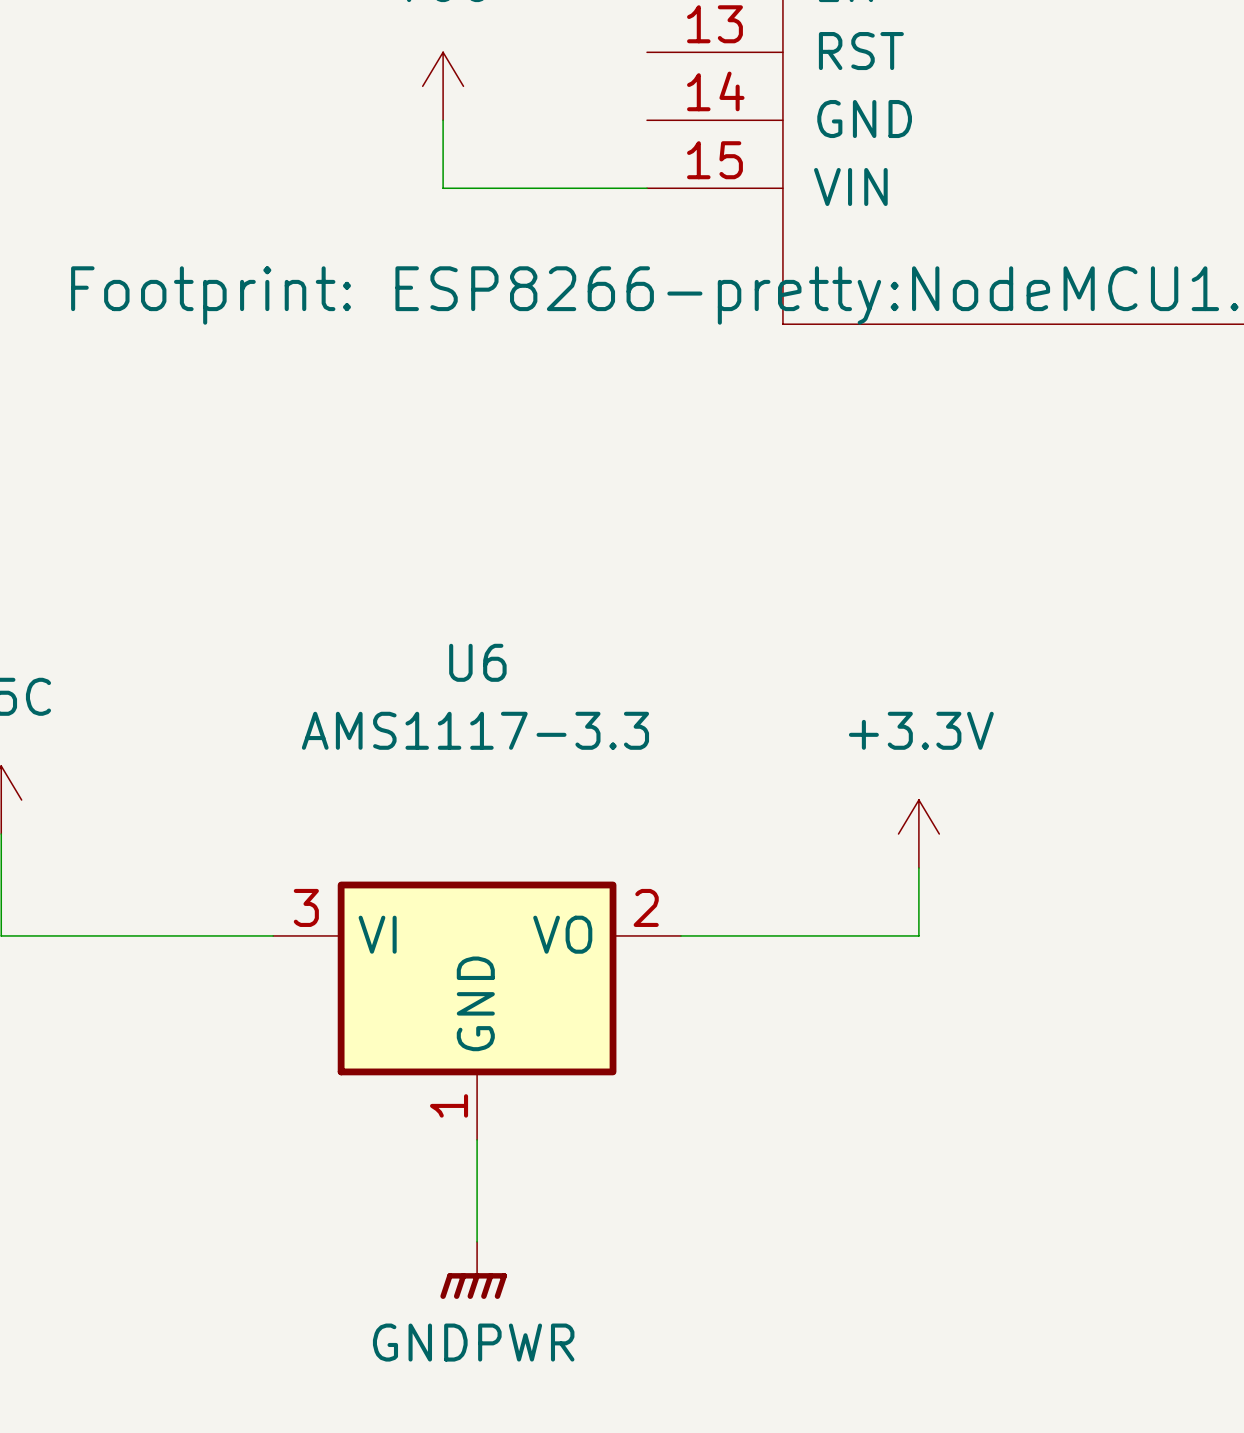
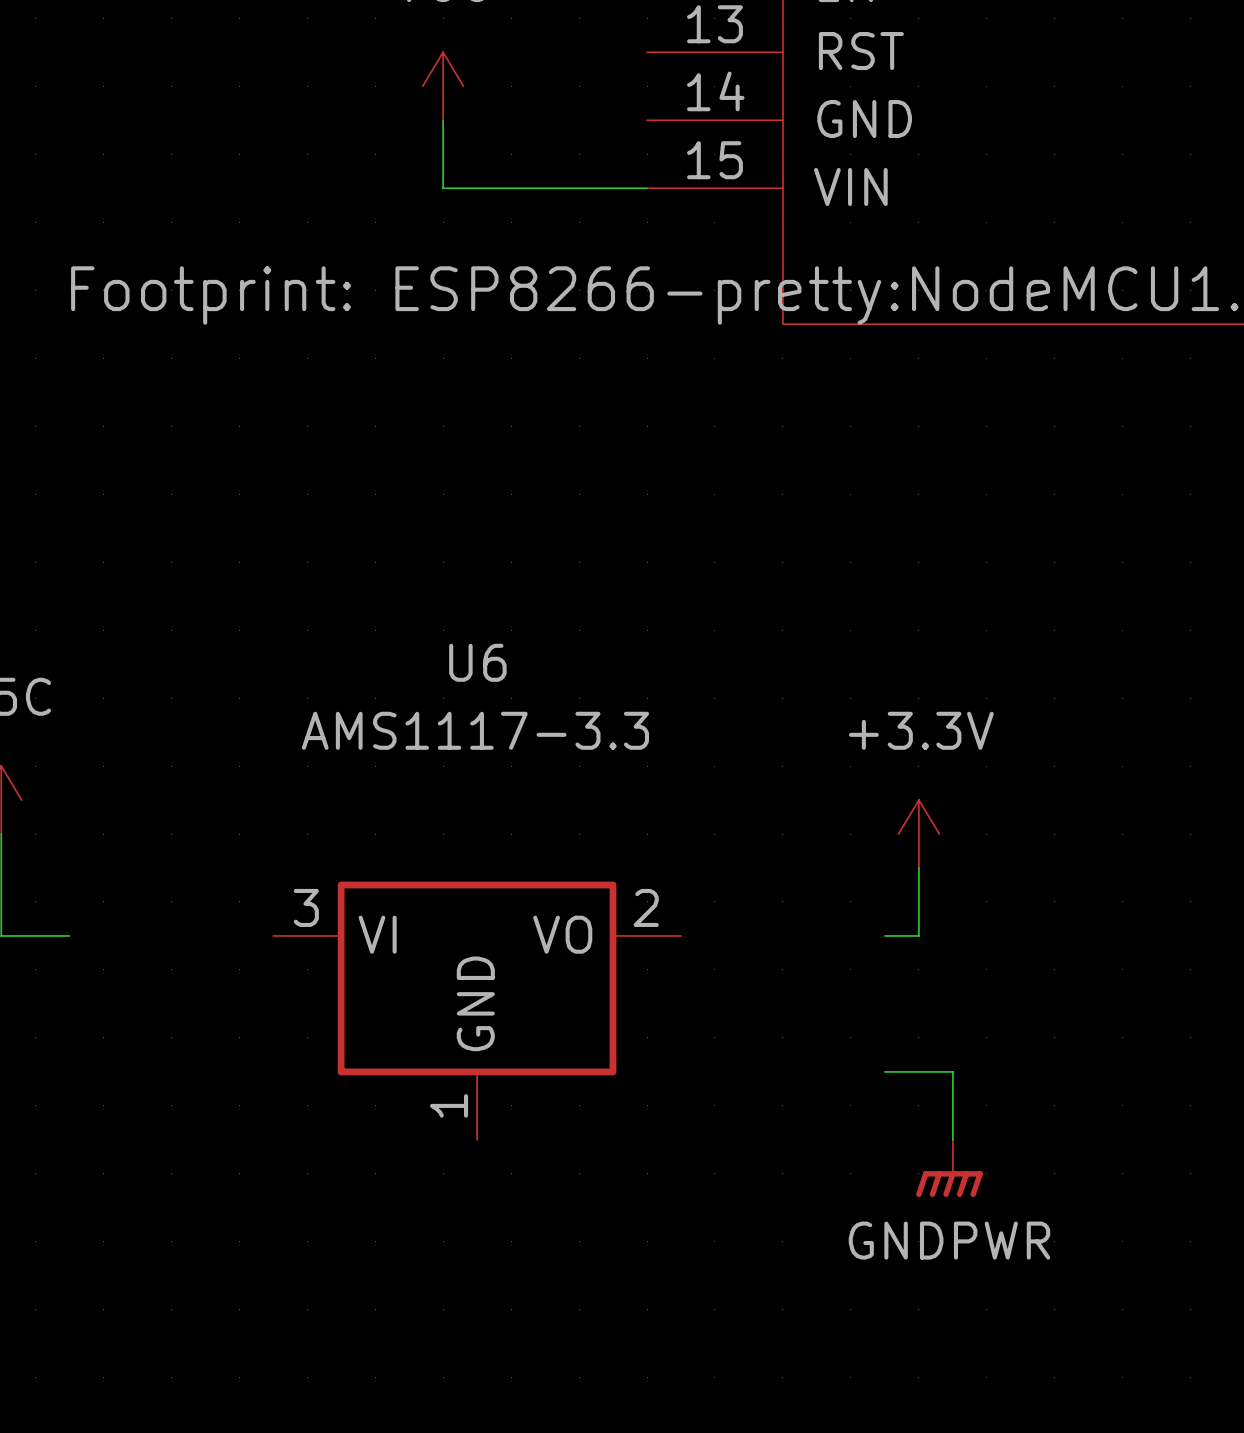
wire: (69, 935) (273, 935) -> none
wire: (681, 935) (884, 935) -> none
wire: none -> (884, 1071) (952, 1071) (952, 1139)
wire: (477, 1139) (477, 1241) -> none
power symbol position: GNDPWR (473, 1270) -> GNDPWR (949, 1168)

